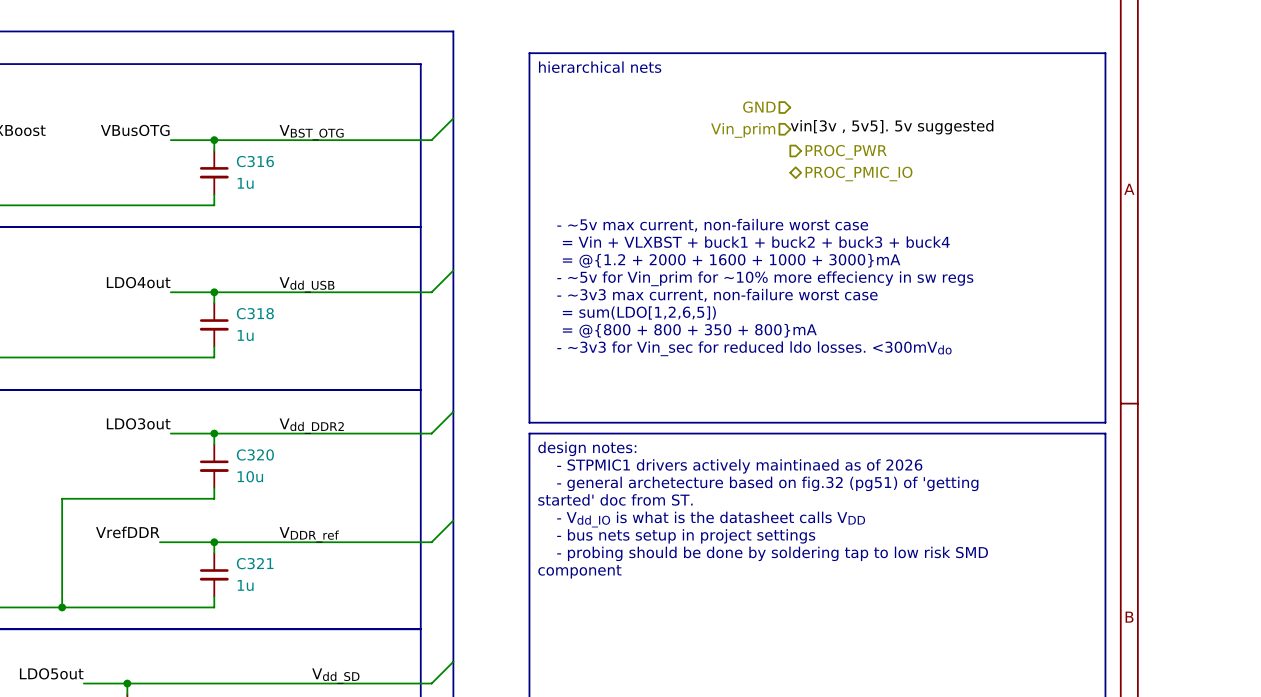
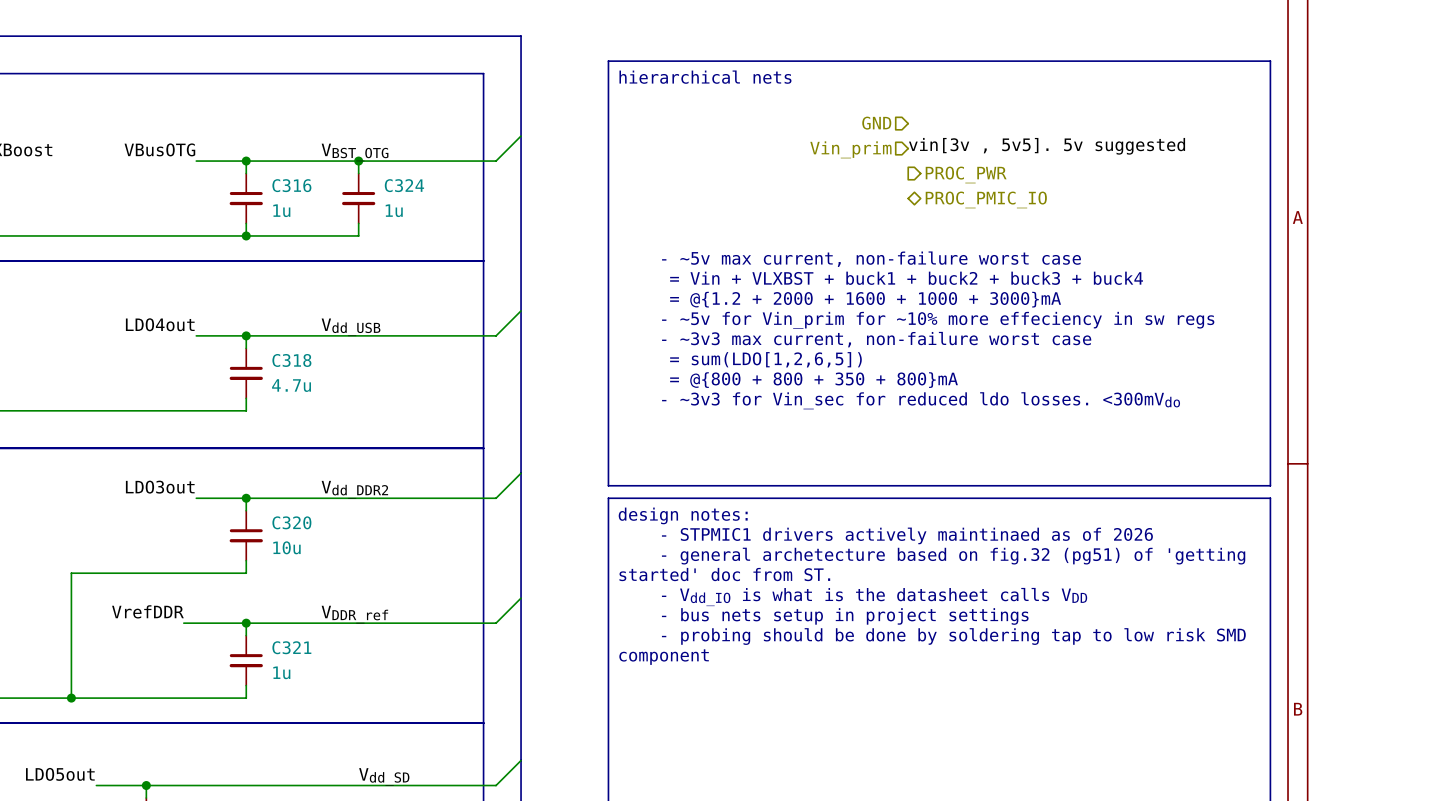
wire: none -> (358, 161) (358, 173)
junction: none -> (358, 161)
C324: none -> 1u (358, 198)
wire: none -> (358, 223) (358, 235) (246, 235)
junction: none -> (246, 235)
C318 value: 1u (245, 335) -> 4.7u (291, 385)

